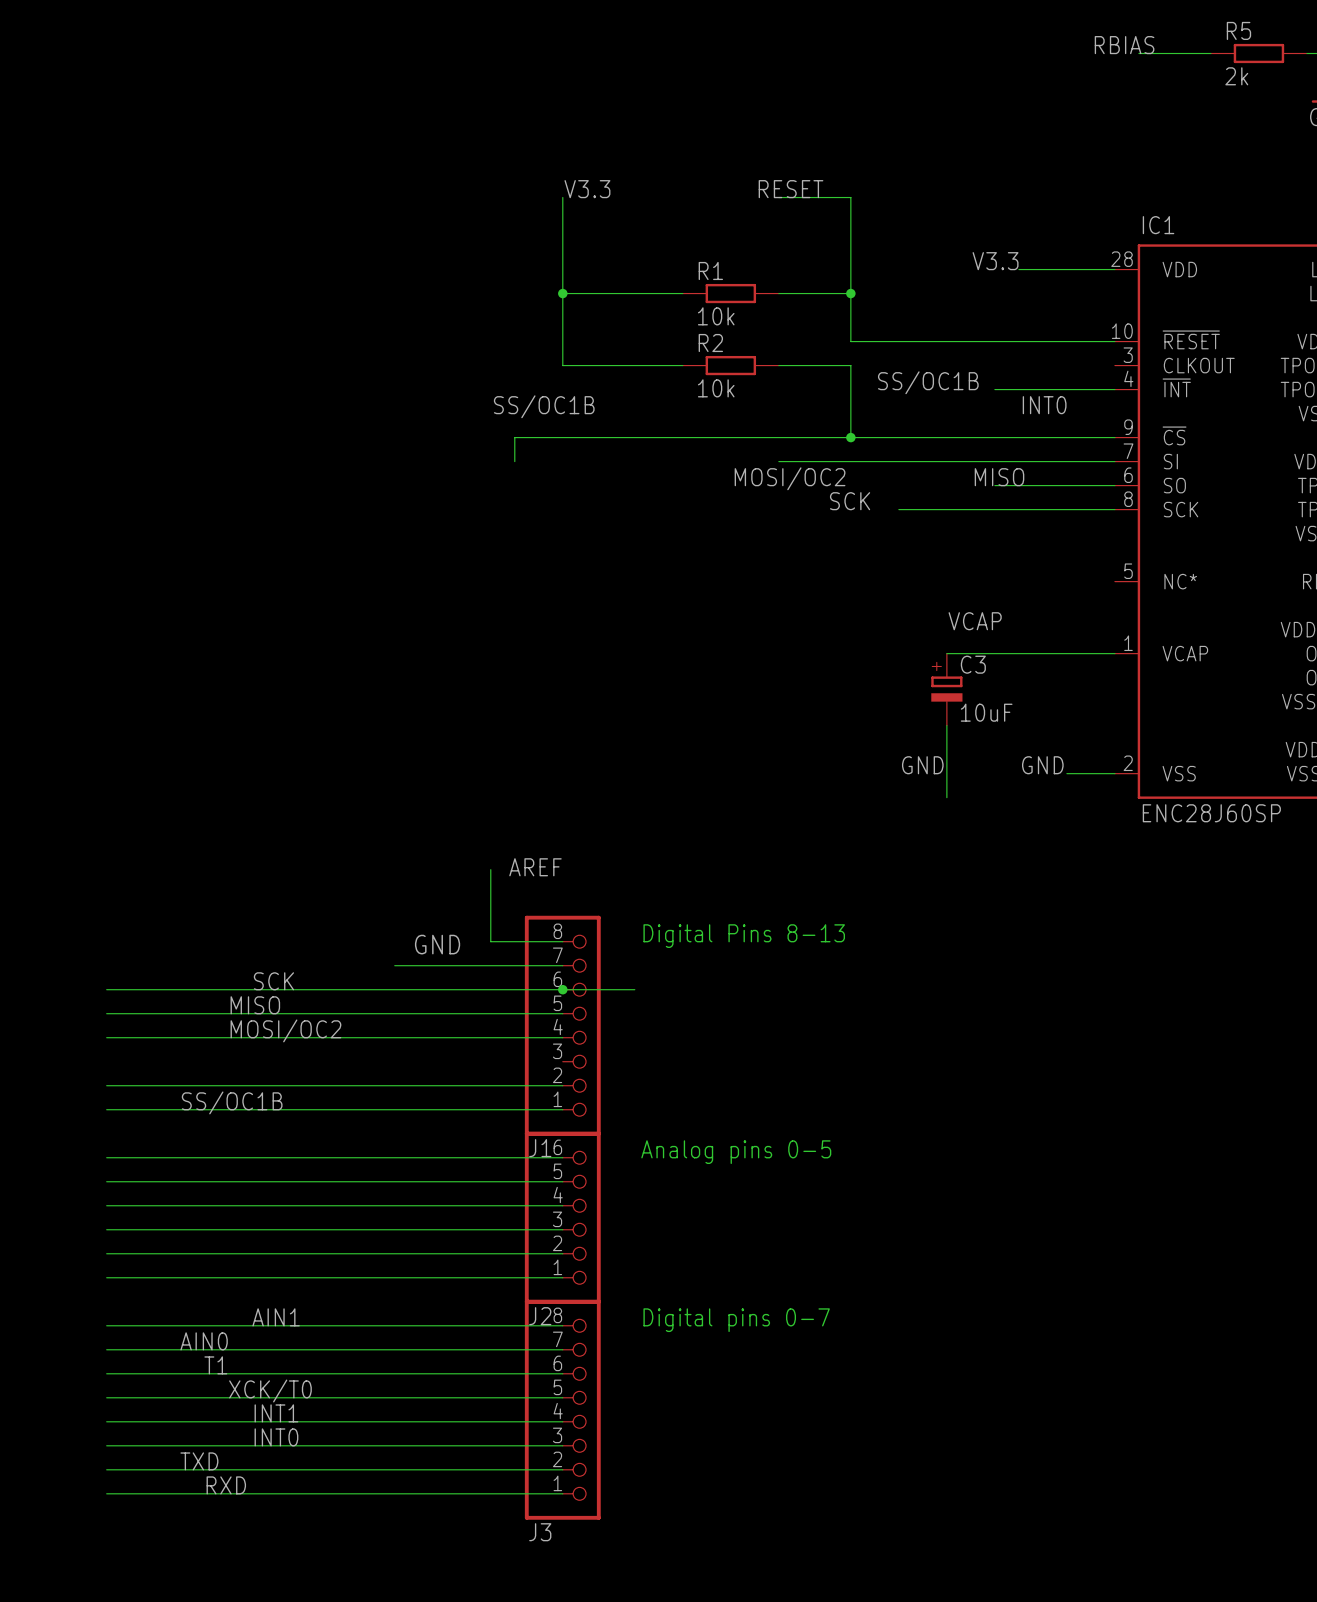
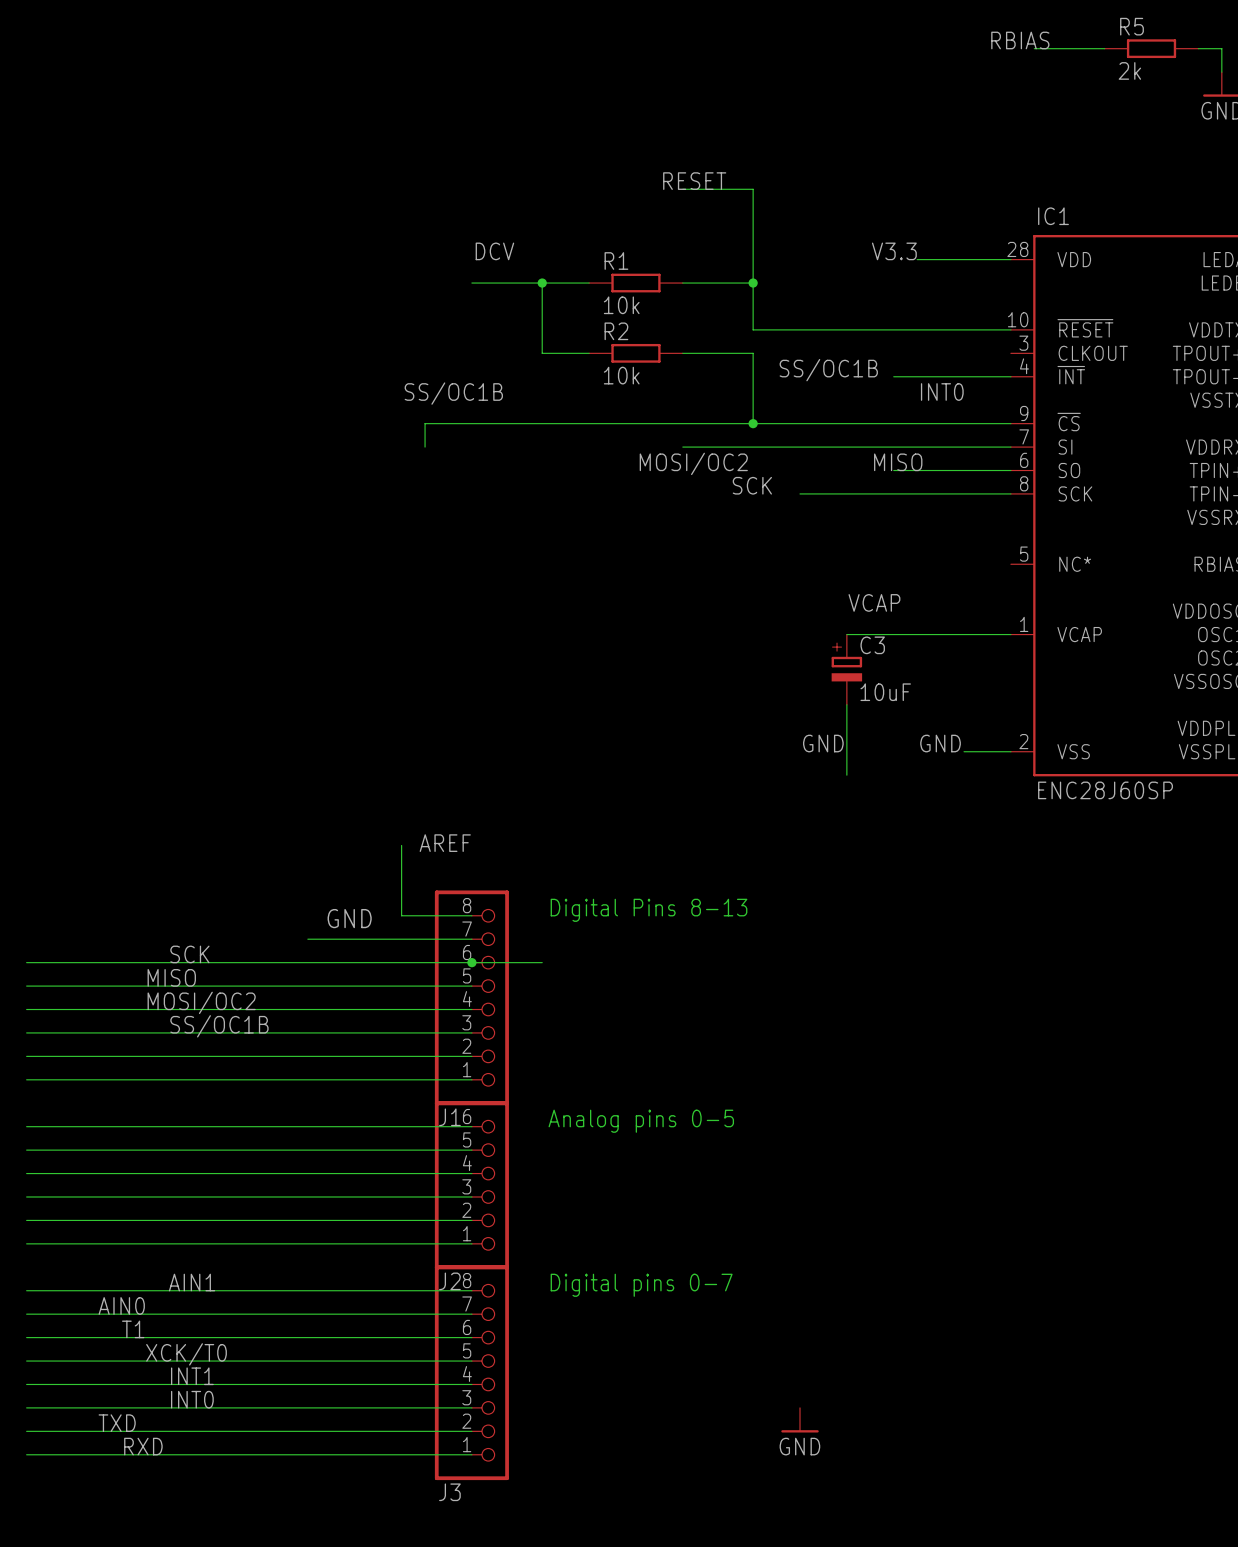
label: V3.3 (587, 189) -> none
wire: (562, 197) (562, 365) (634, 365) -> (542, 283) (542, 353)
label: none -> DCV (494, 251)
junction: (562, 293) -> none
junction: none -> (542, 283)
wire: none -> (26, 1032) (471, 1032)
label position: SS/OC1B (232, 1102) -> SS/OC1B (219, 1026)
power symbol: none -> GND (800, 1420)

